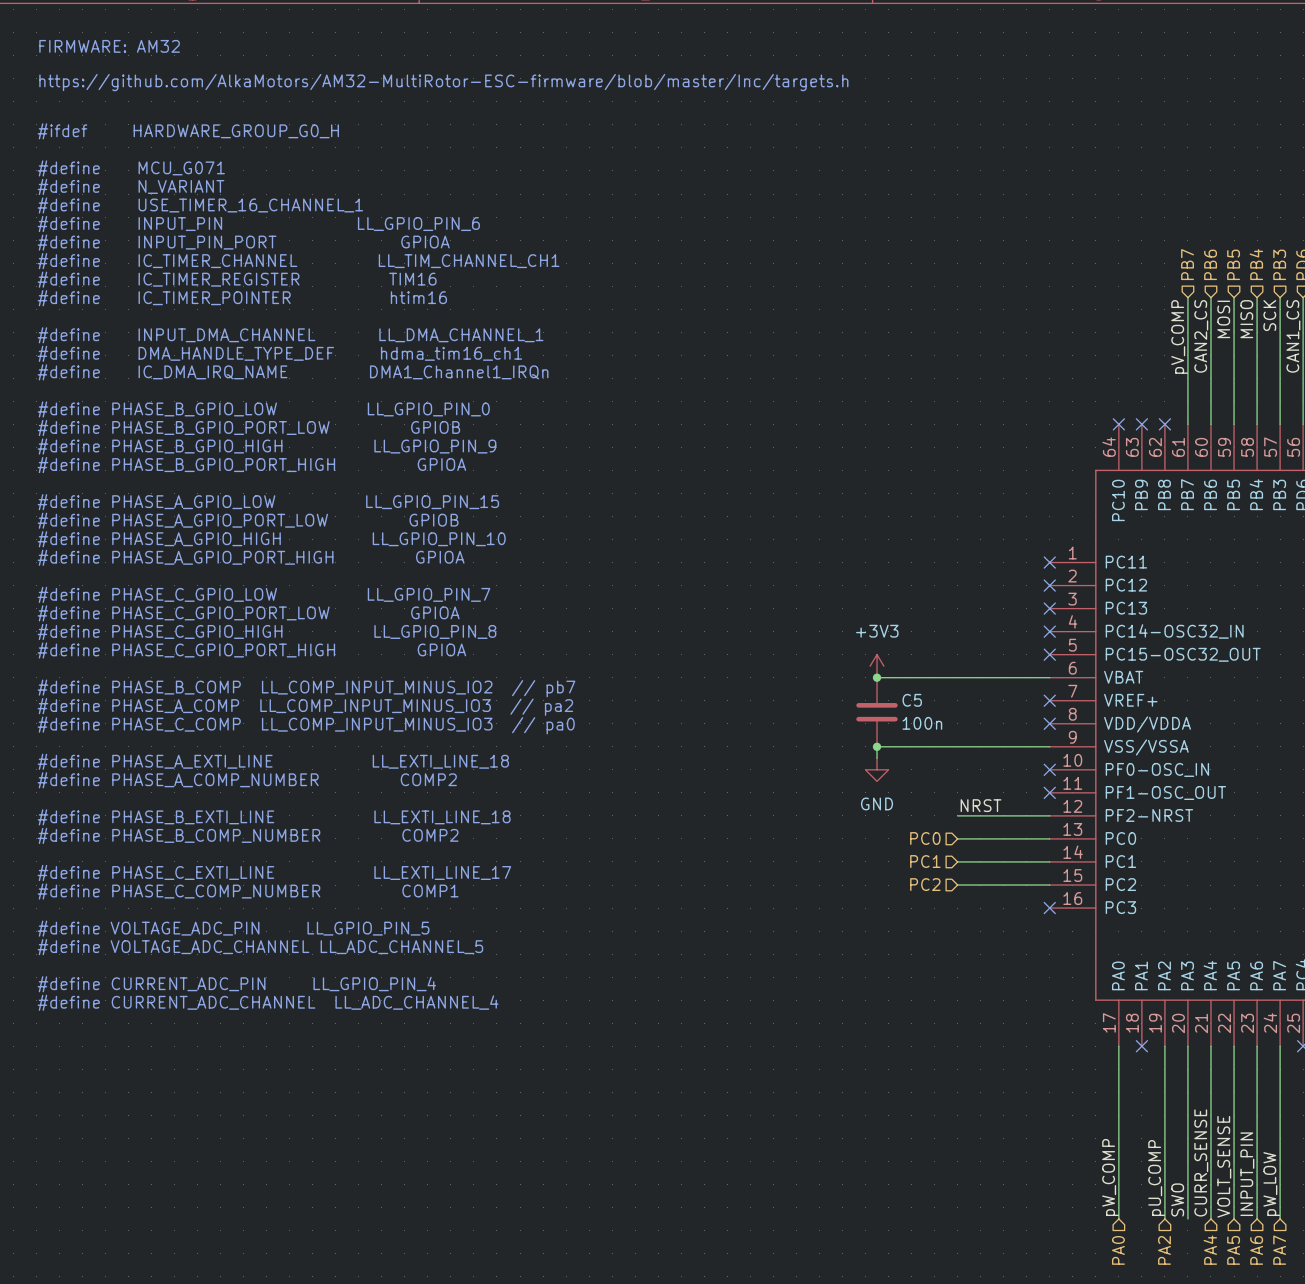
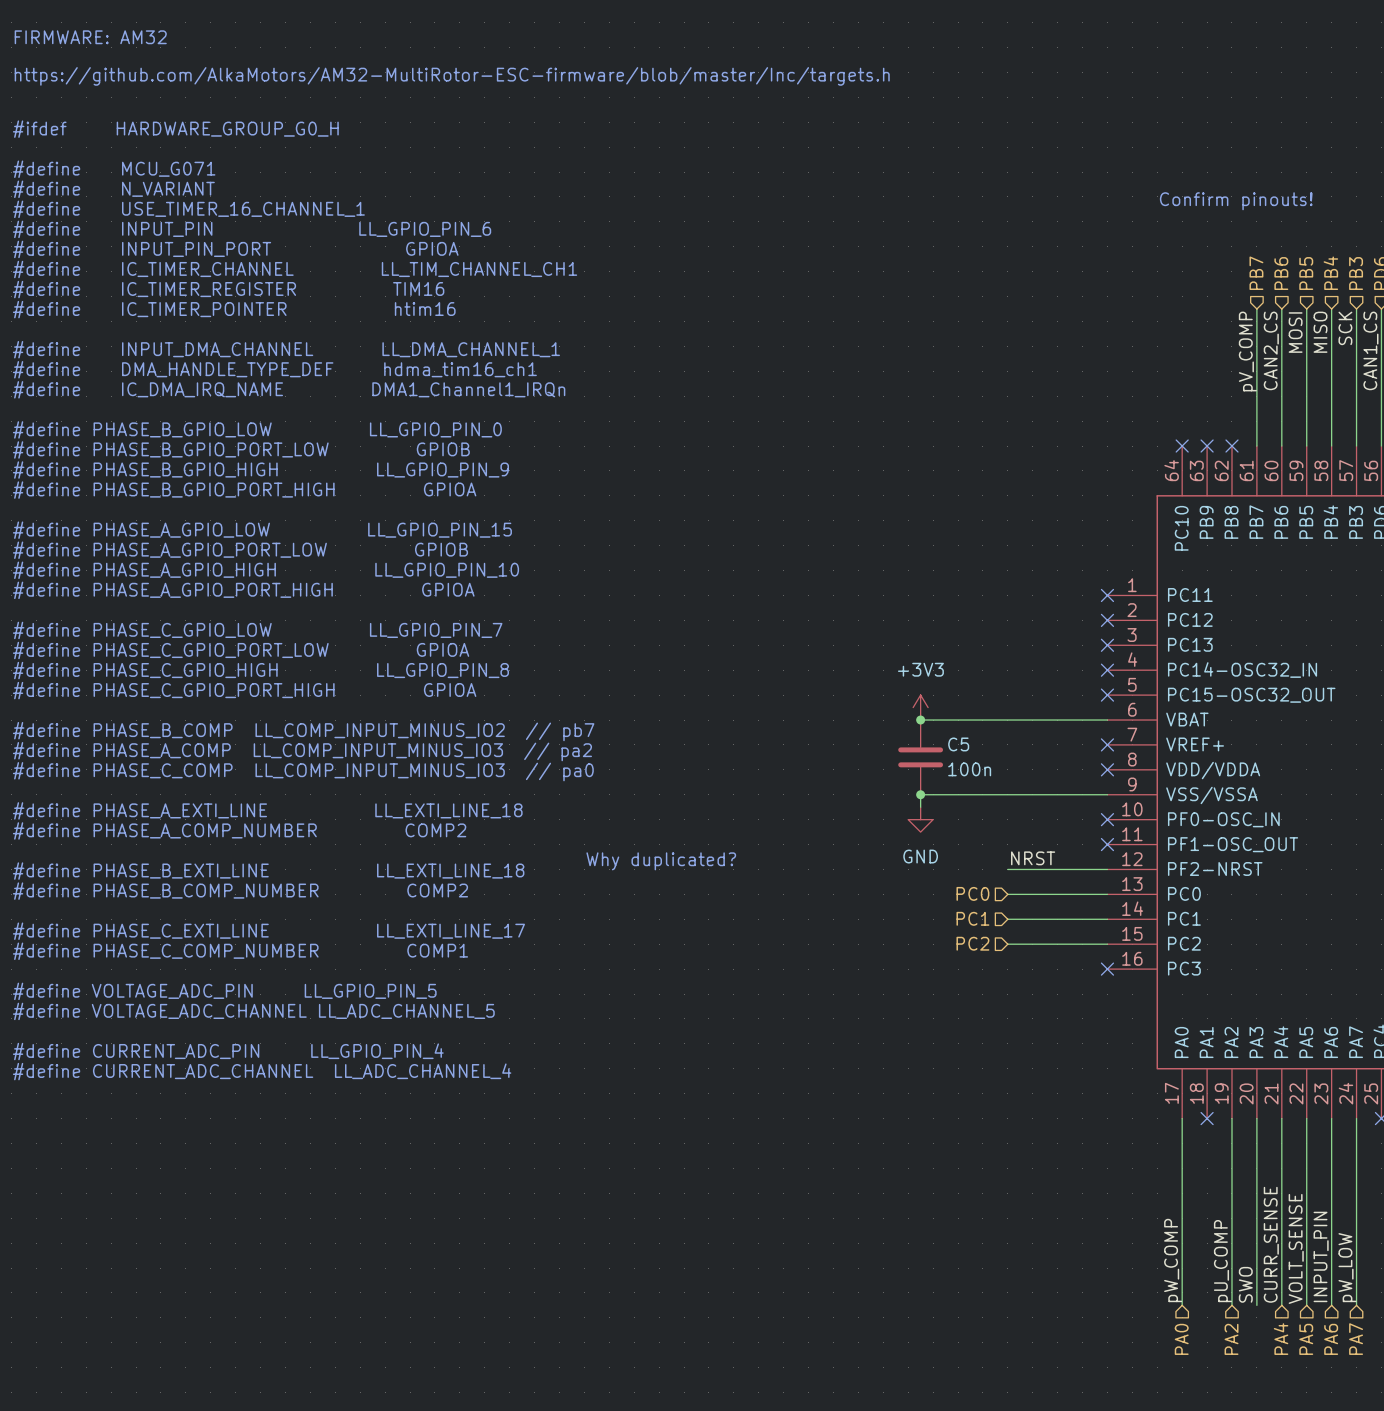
text: none -> Confirm pinouts! (1236, 201)
text: none -> Why duplicated? (661, 861)

